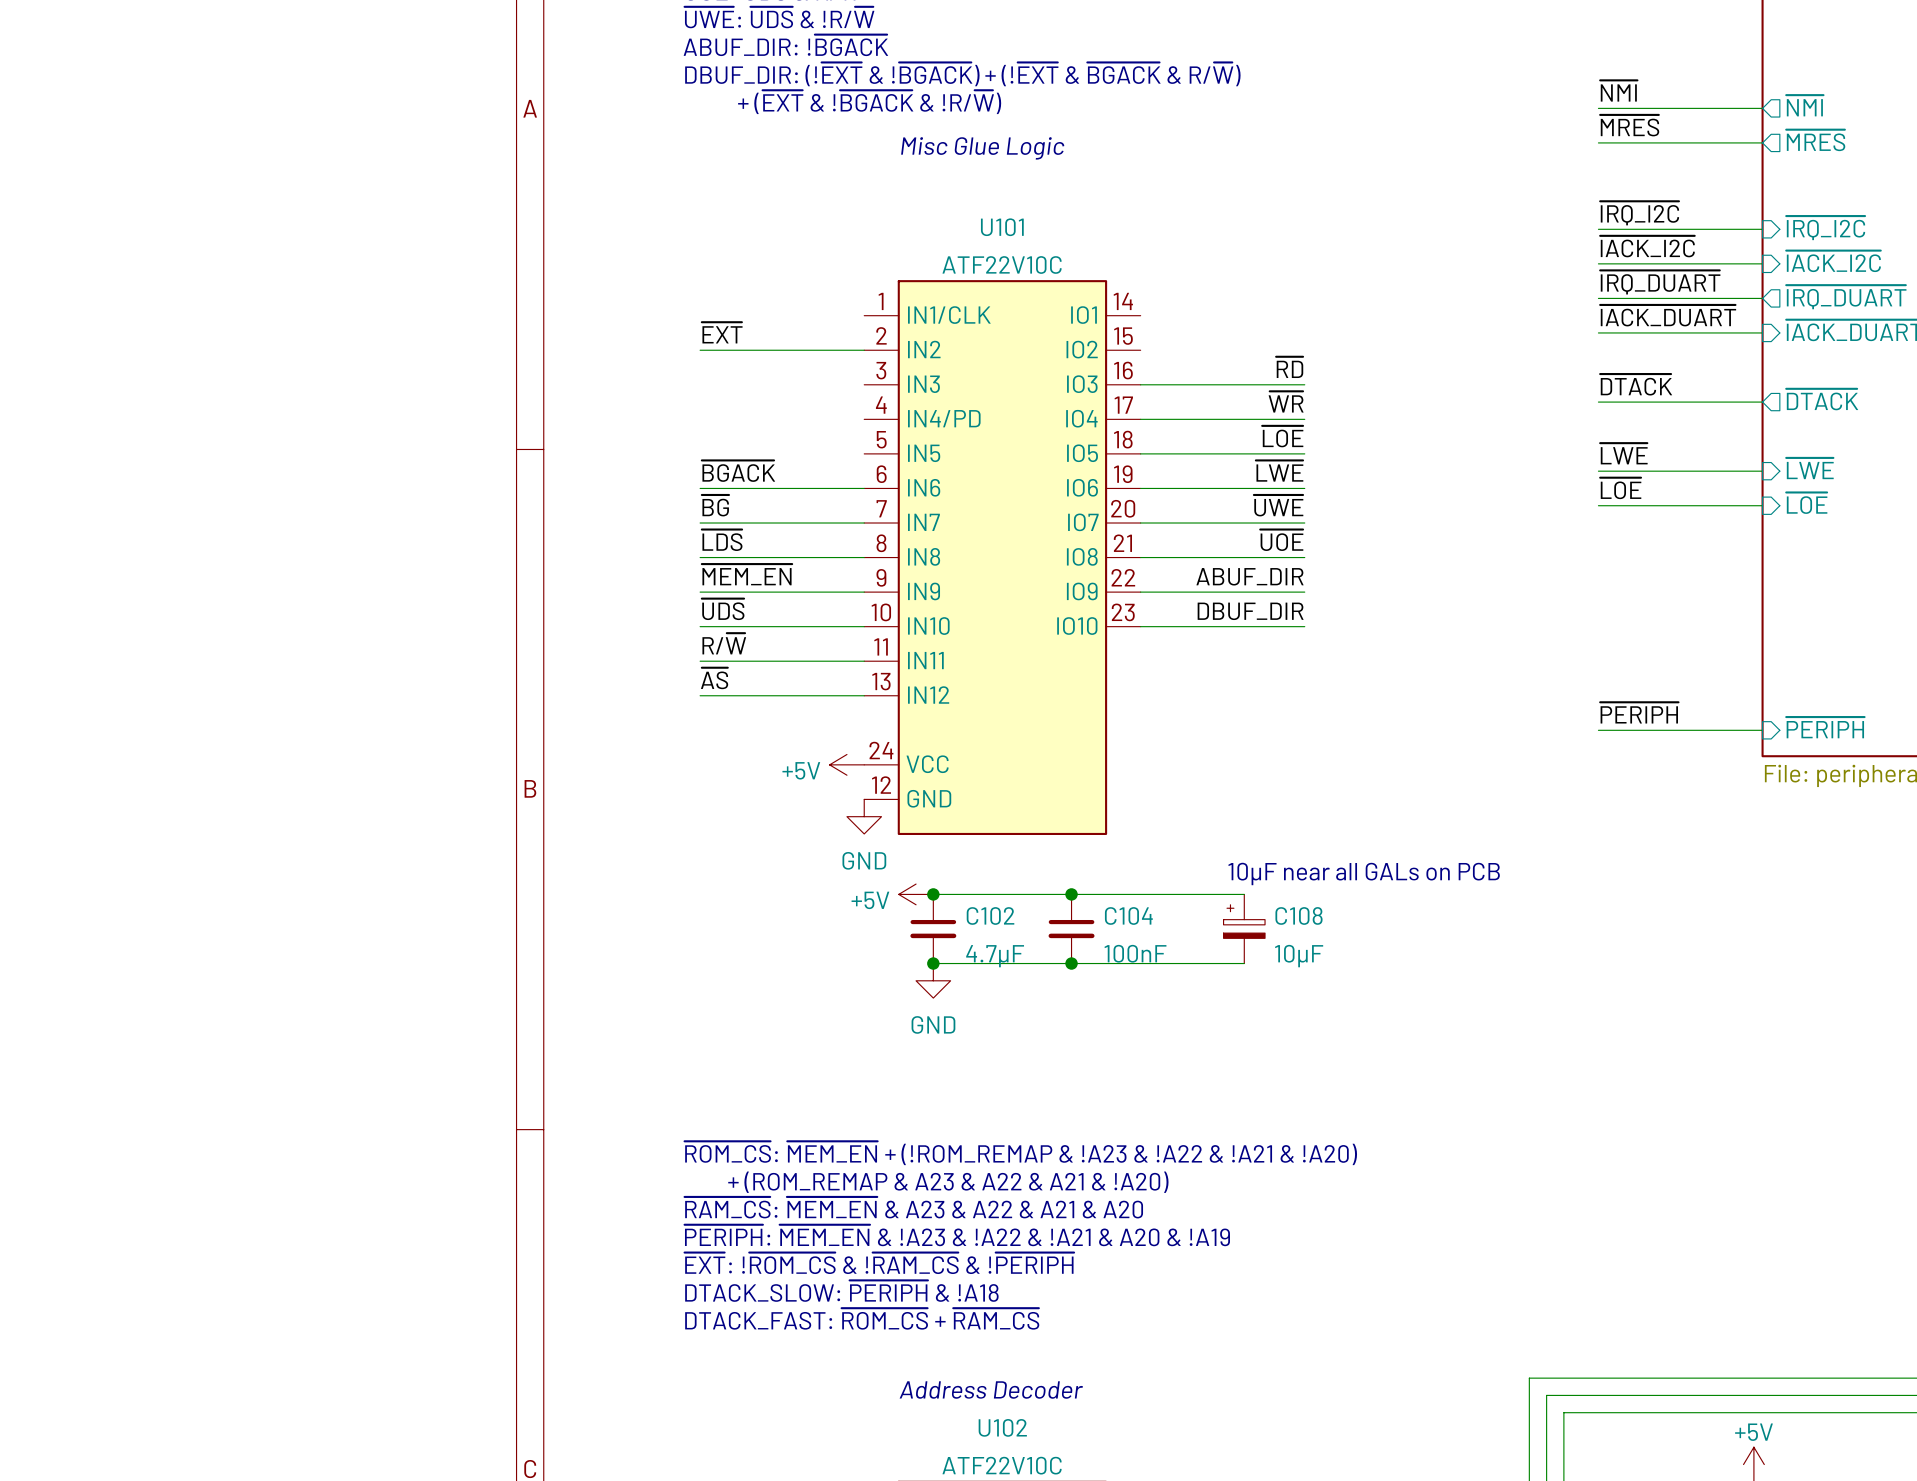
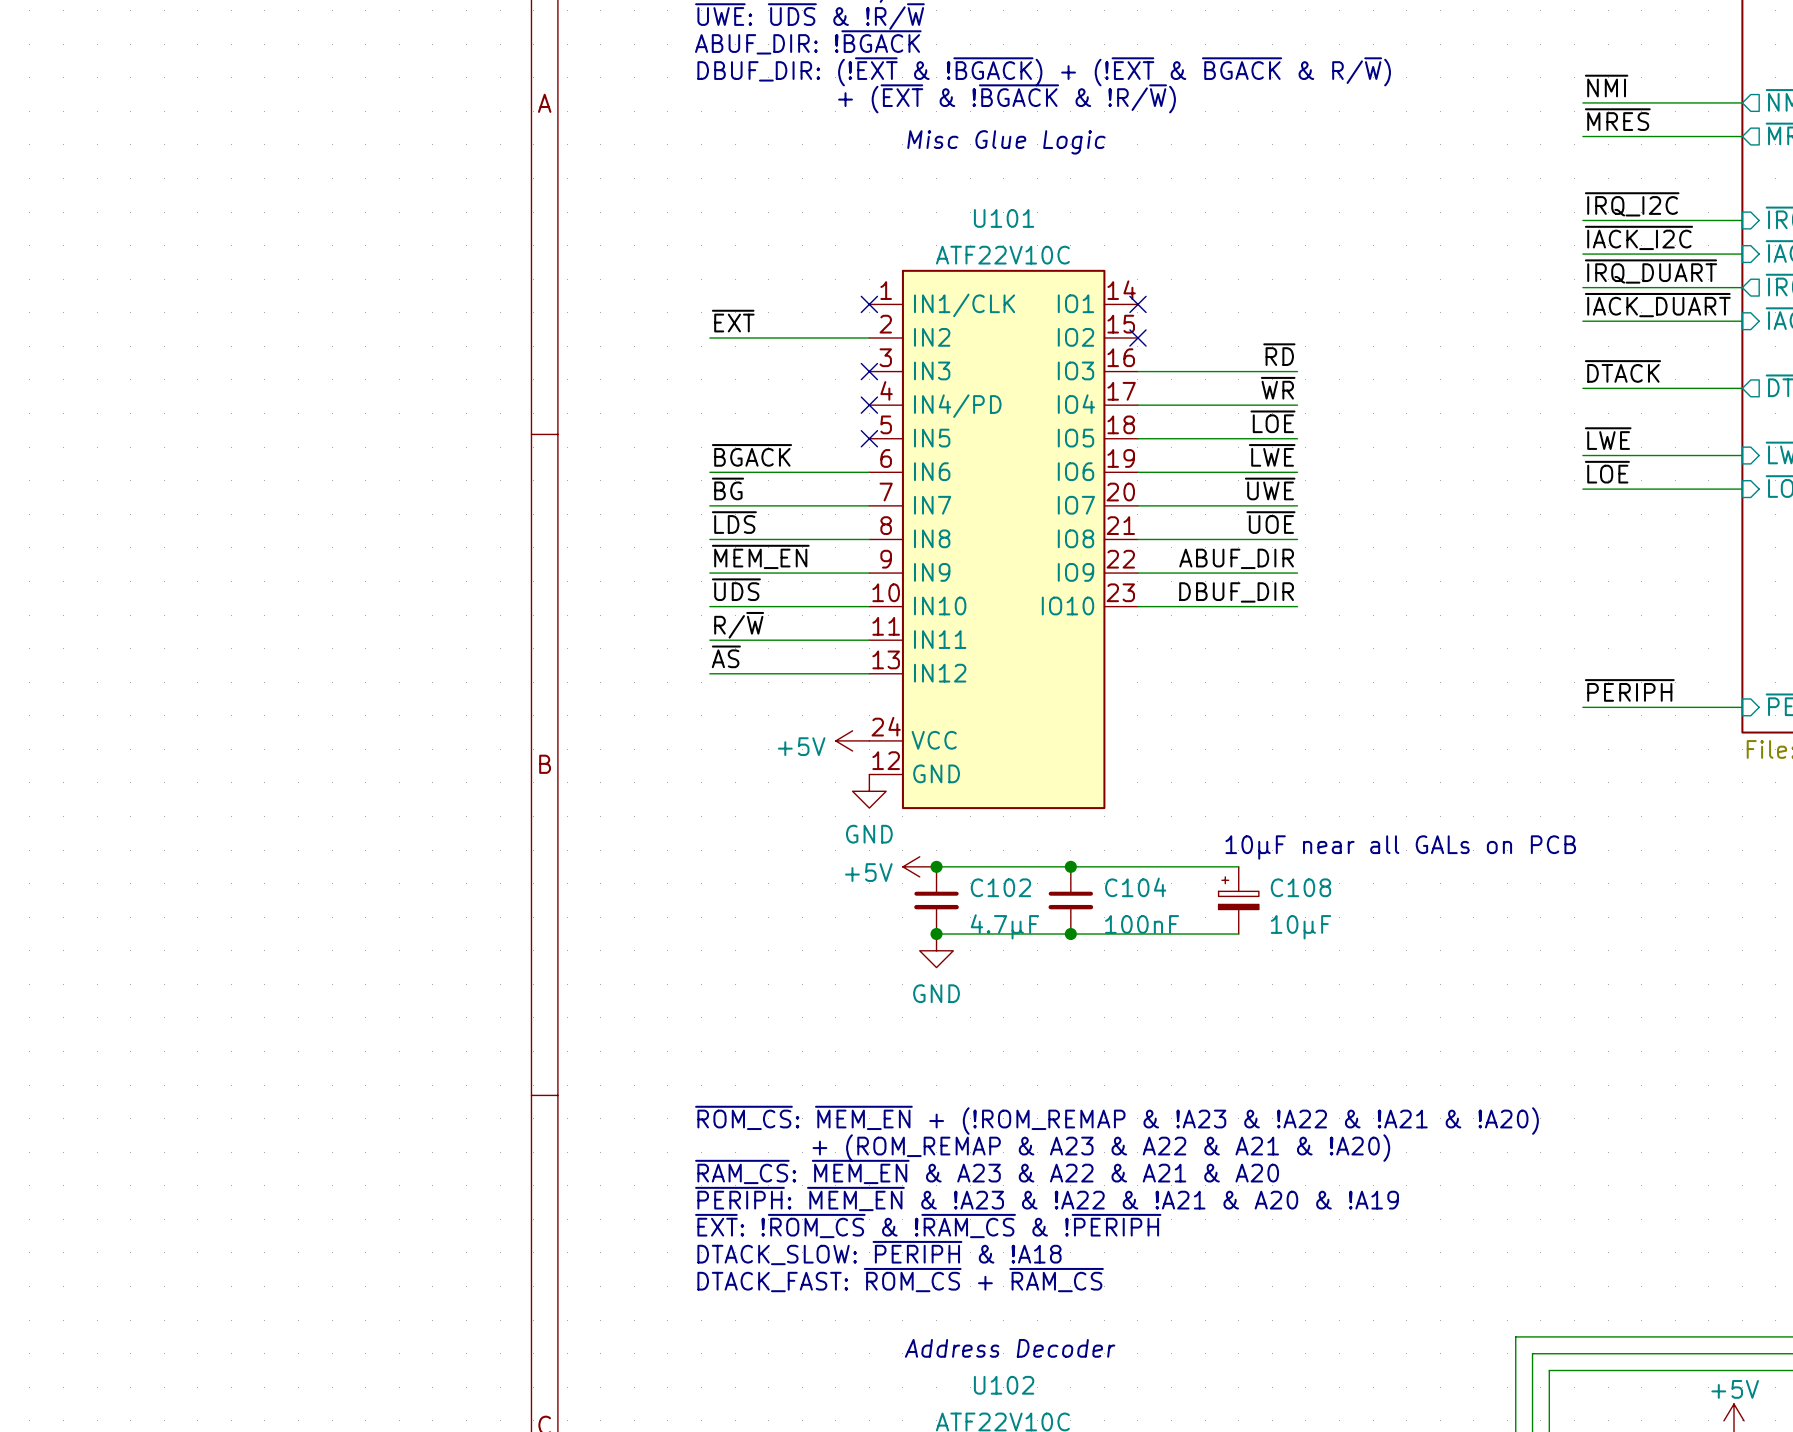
no-connect mark: none -> (869, 304)
no-connect mark: none -> (1137, 304)
no-connect mark: none -> (1137, 338)
no-connect mark: none -> (869, 371)
no-connect mark: none -> (869, 405)
no-connect mark: none -> (869, 438)

